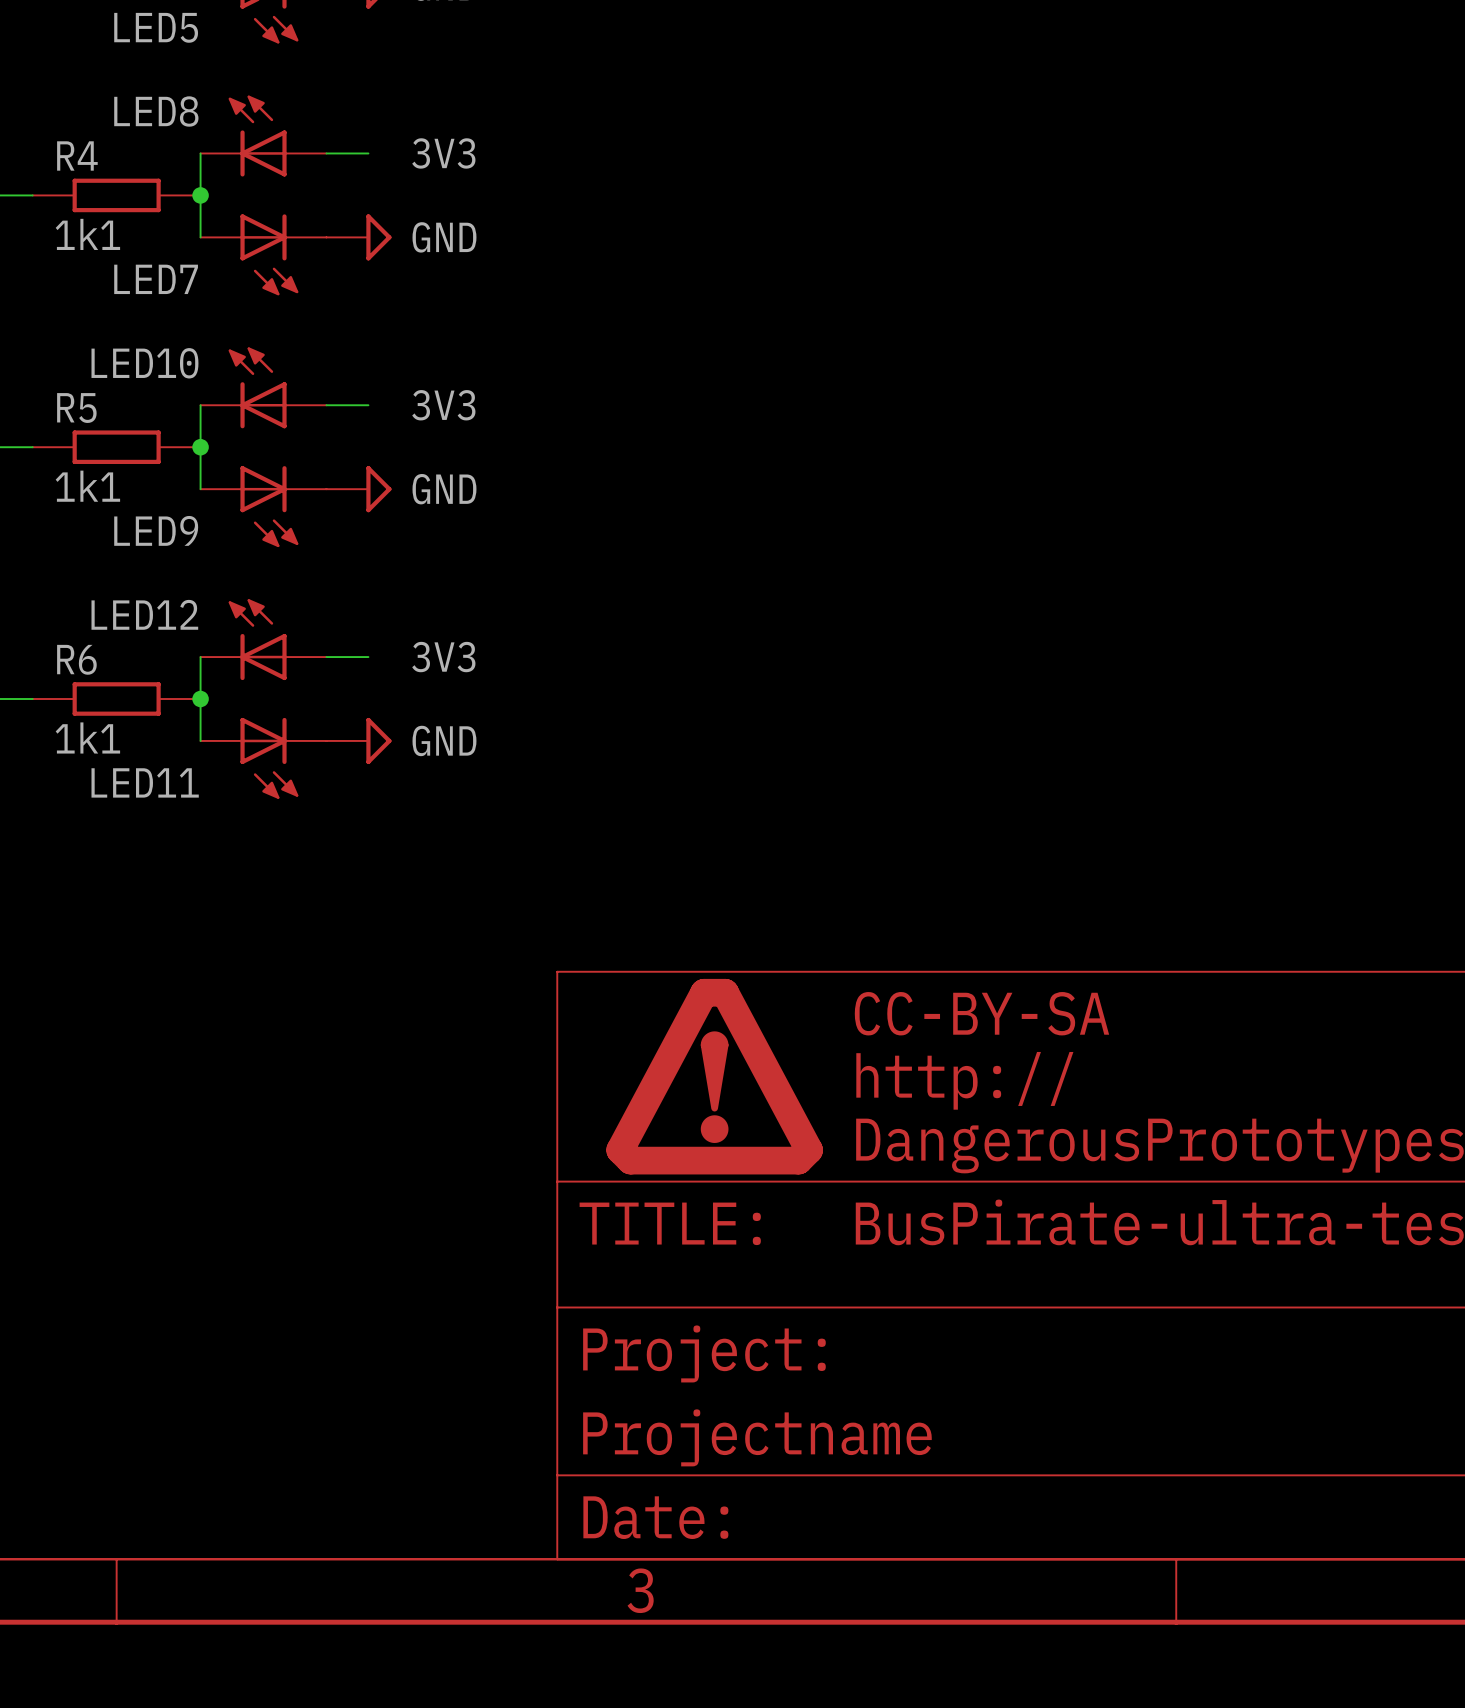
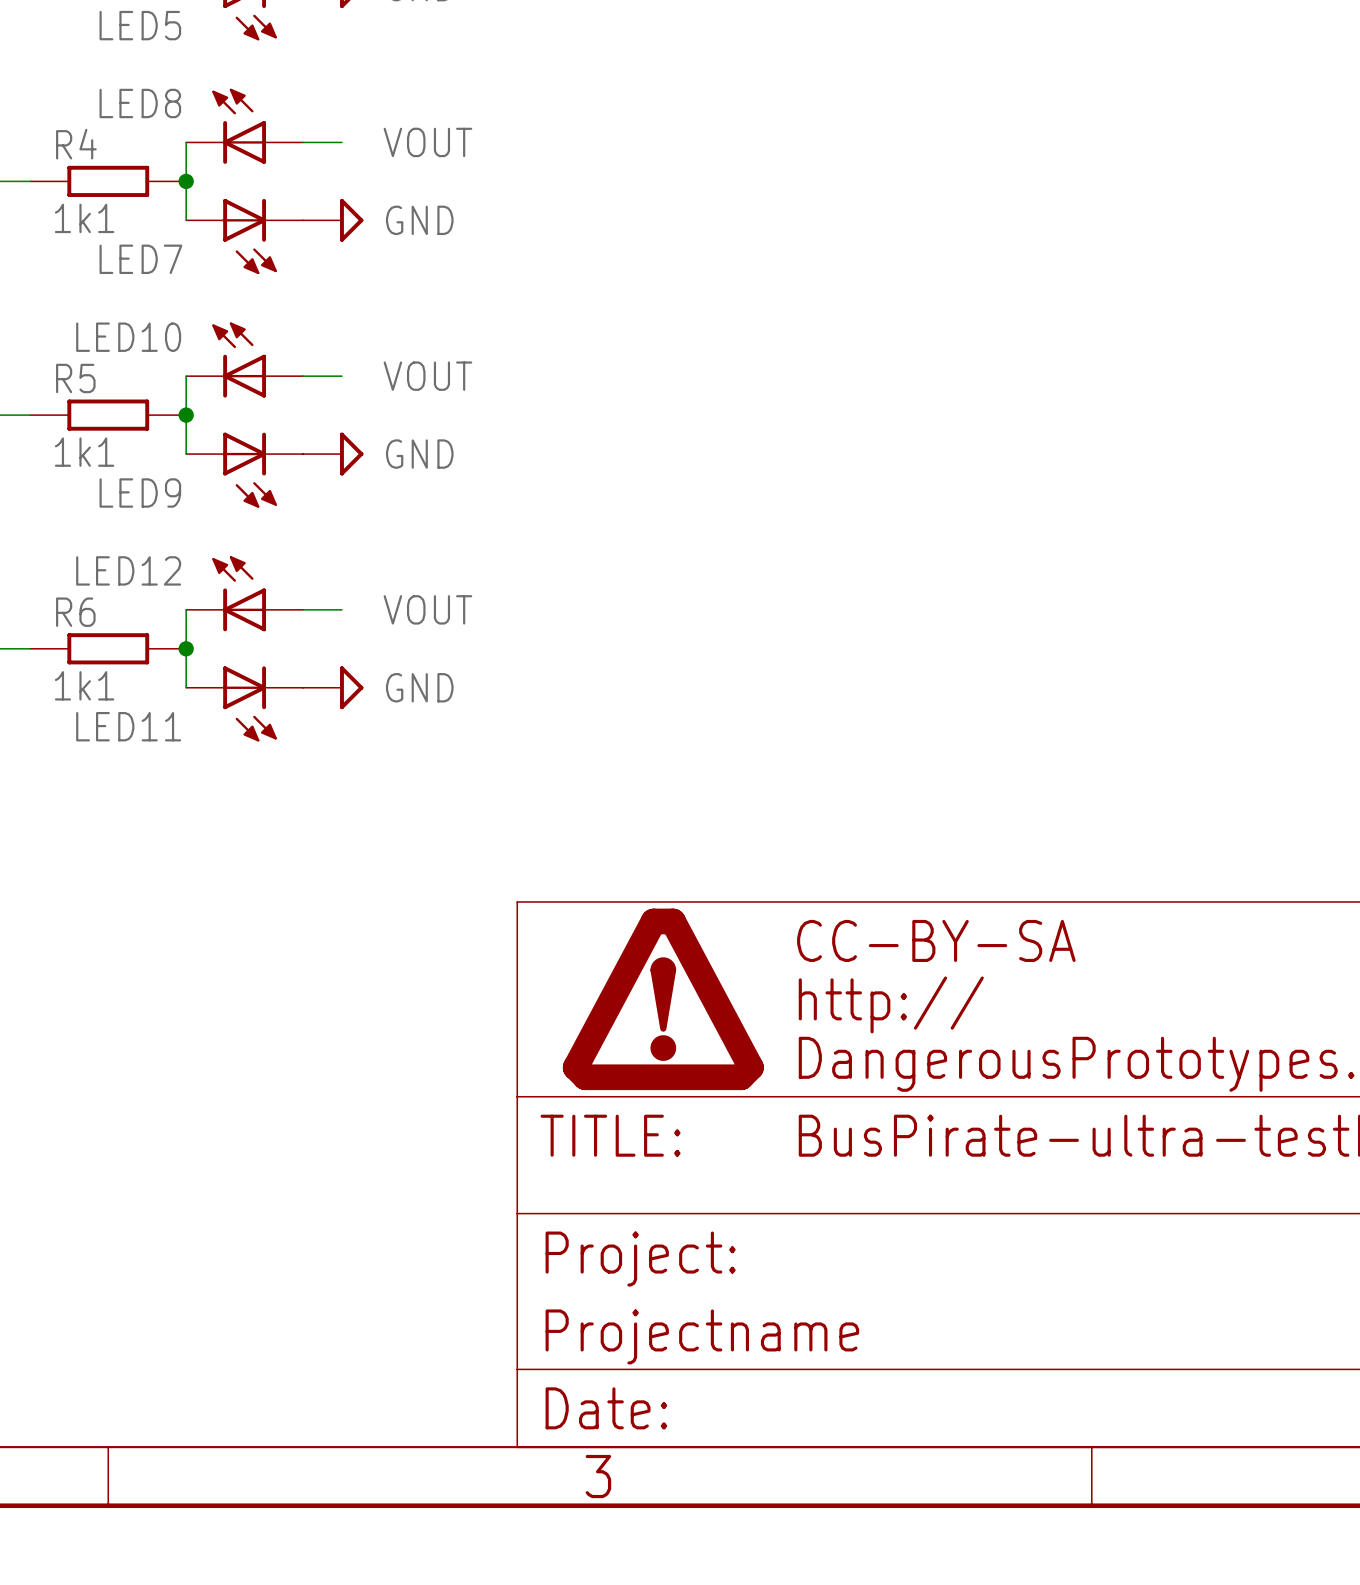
label: 3V3 (443, 153) -> VOUT (427, 142)
label: 3V3 (443, 405) -> VOUT (427, 376)
label: 3V3 (443, 657) -> VOUT (427, 609)

